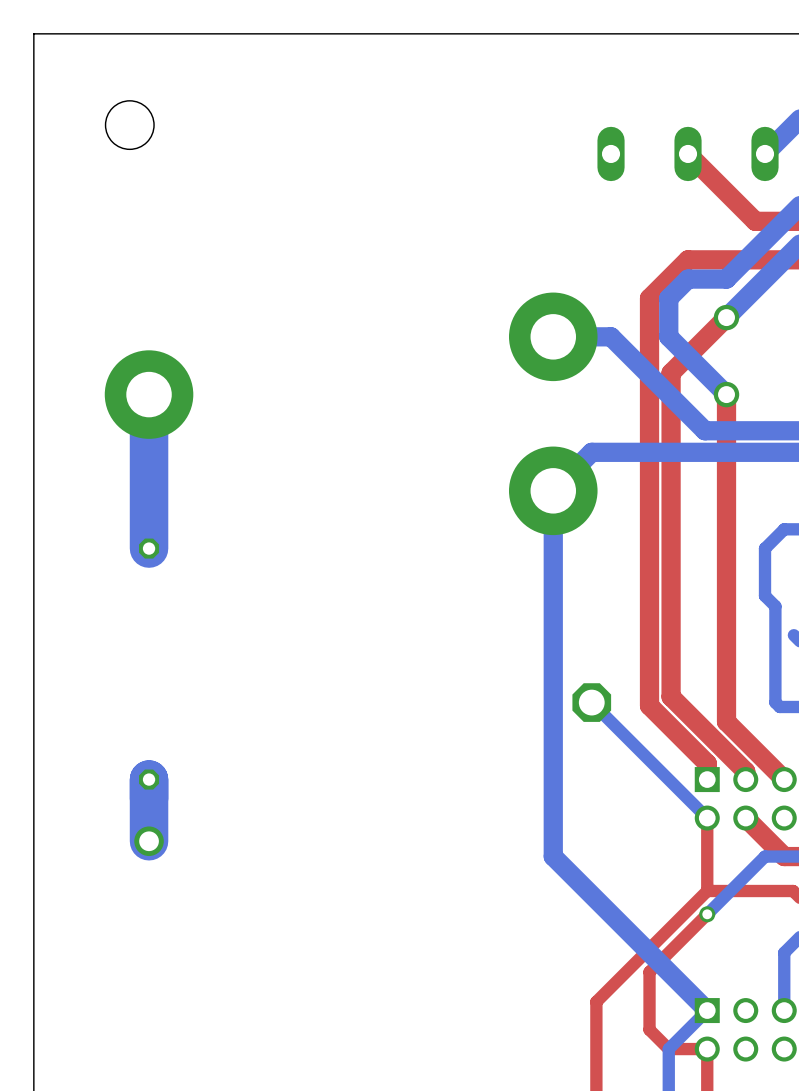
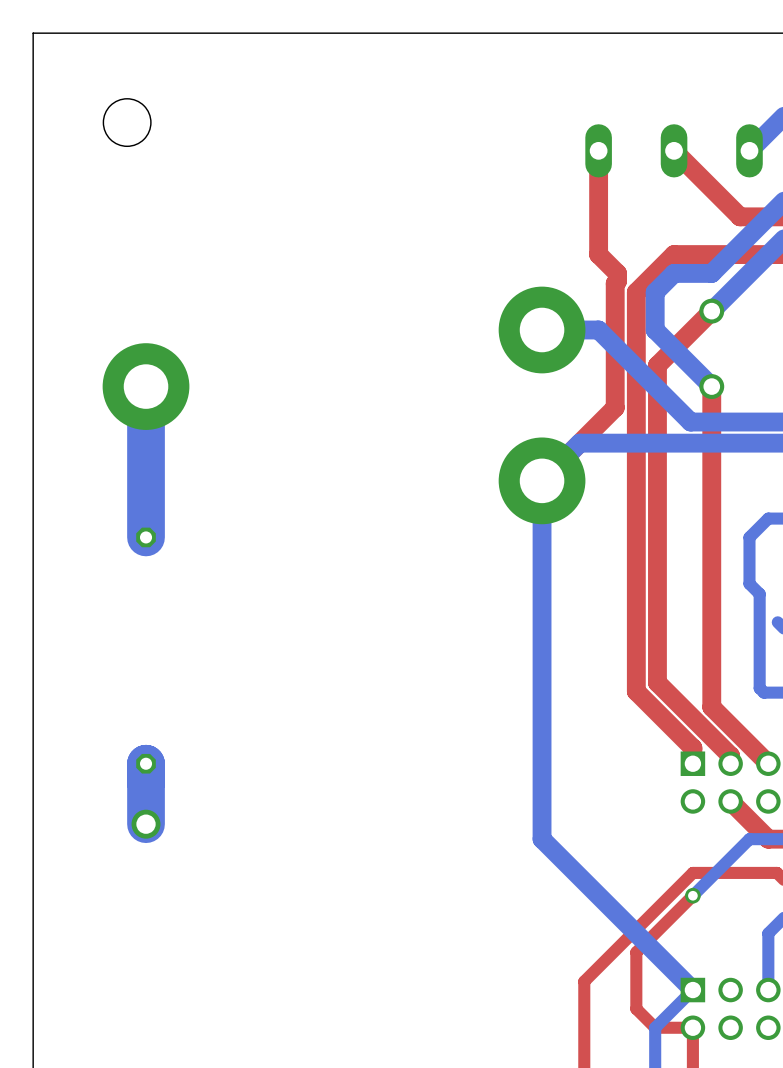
top track: none -> (598, 150) (598, 254) (617, 273) (617, 281) (615, 283) (615, 407) (542, 480)
bottom track: (591, 702) (707, 818) -> none
part: (591, 702) -> none
top track: (707, 818) (707, 891) -> none

